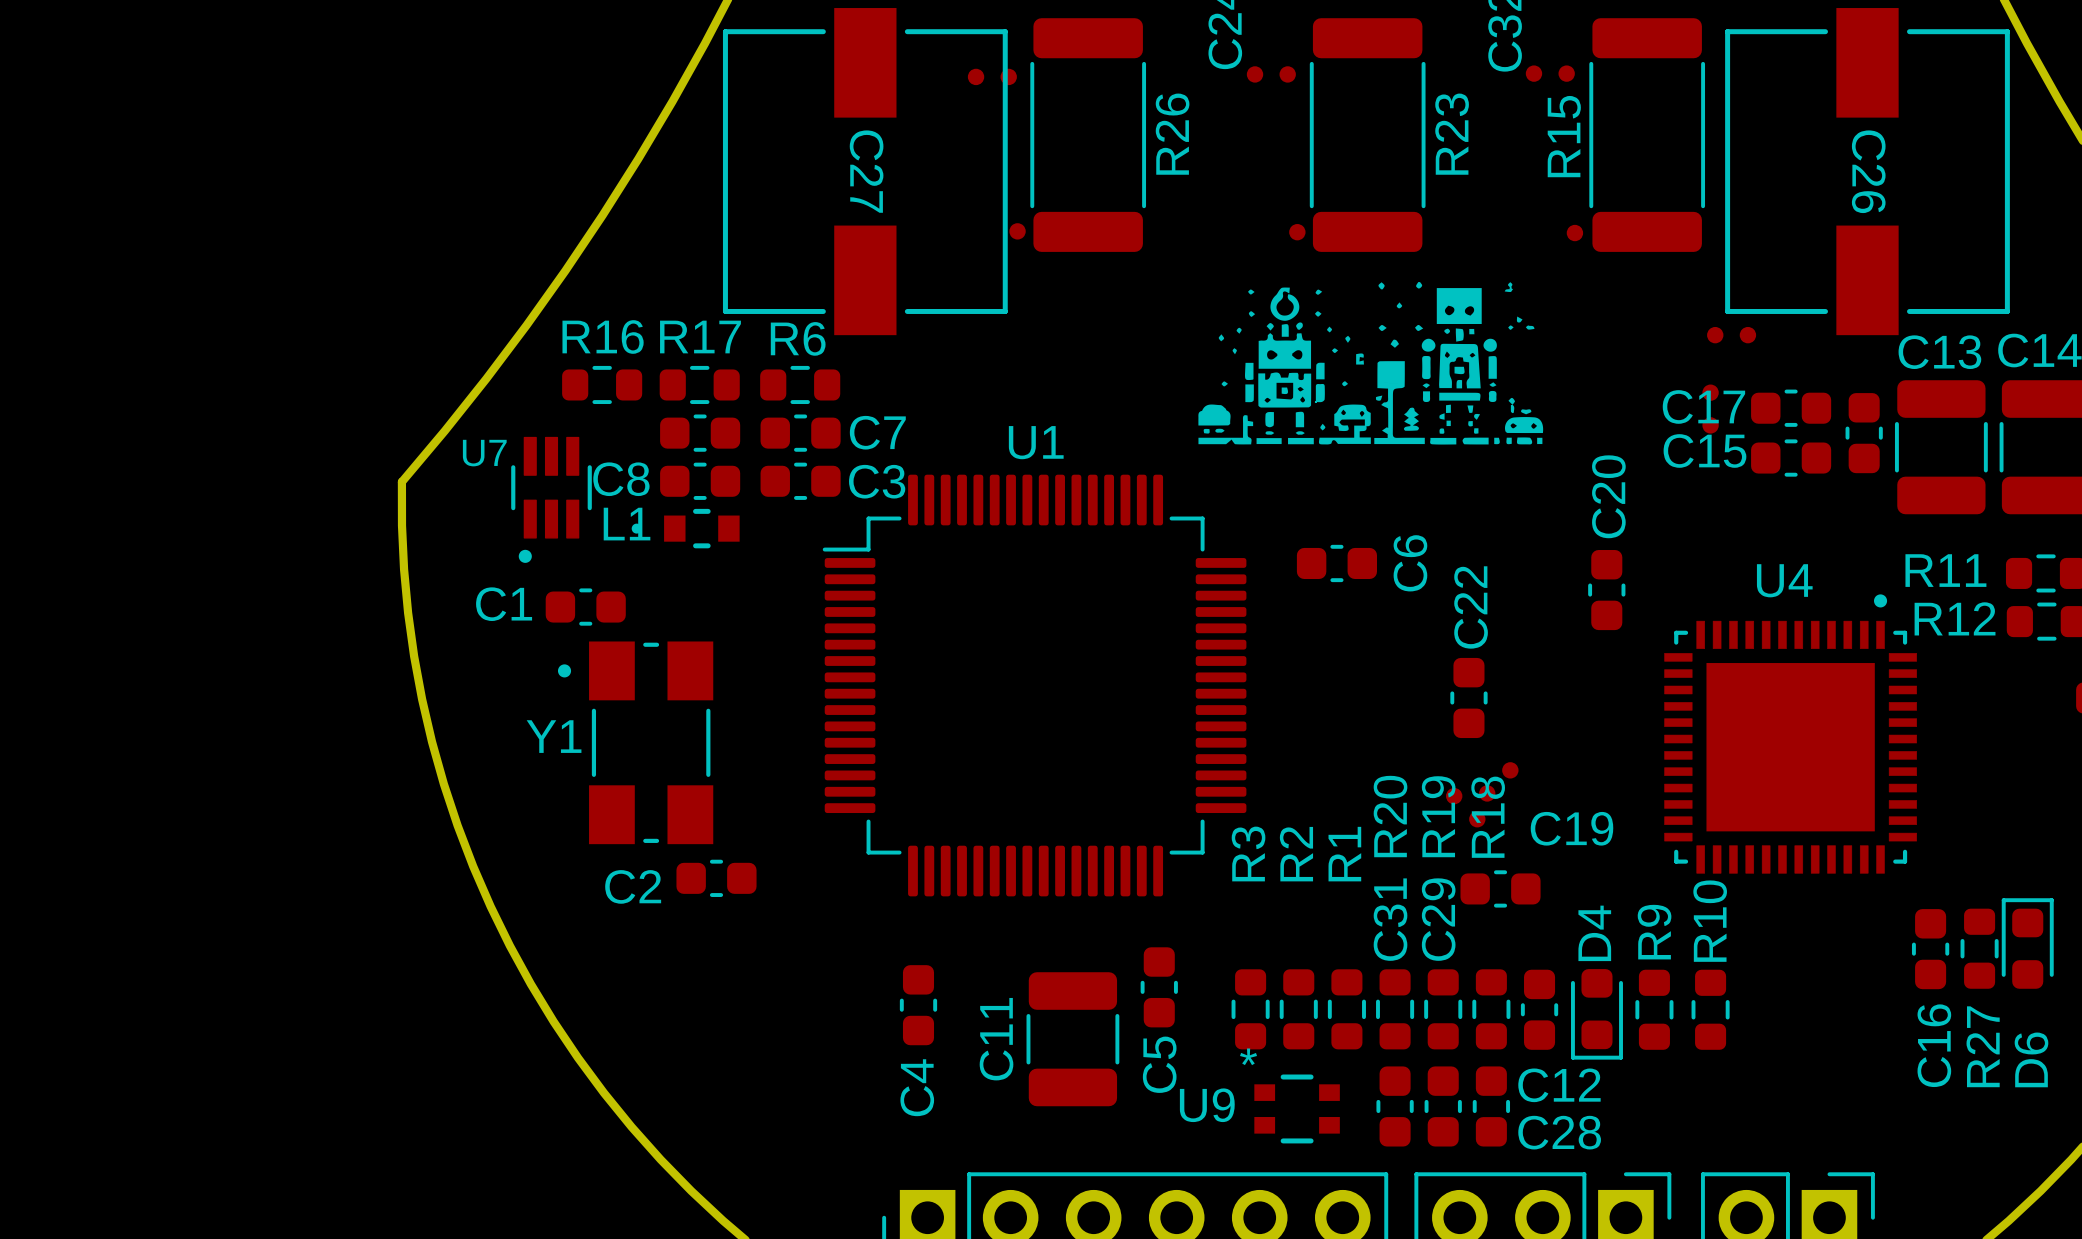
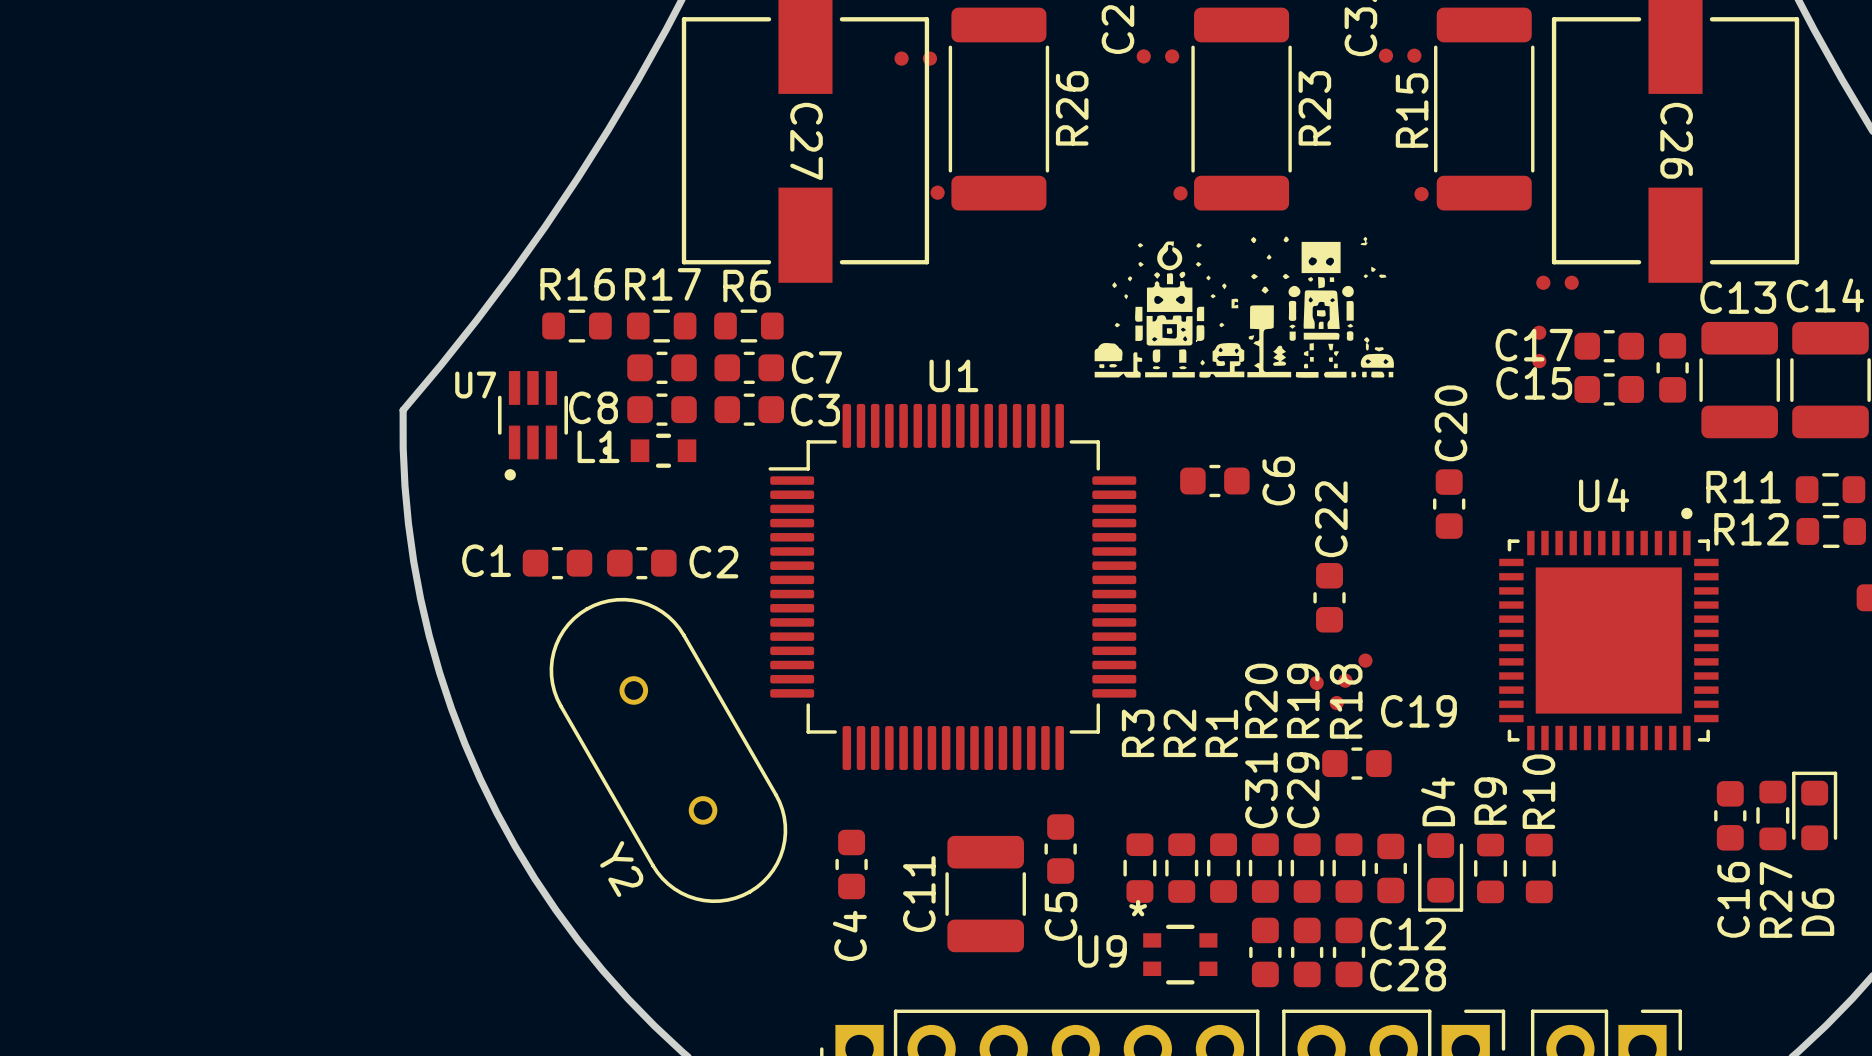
C1 position: (585, 607) -> (557, 563)
Y1: (635, 742) -> none
Y2: none -> (668, 750)
C2 position: (716, 878) -> (641, 563)
C2 name position: C2 (633, 886) -> C2 (713, 562)

